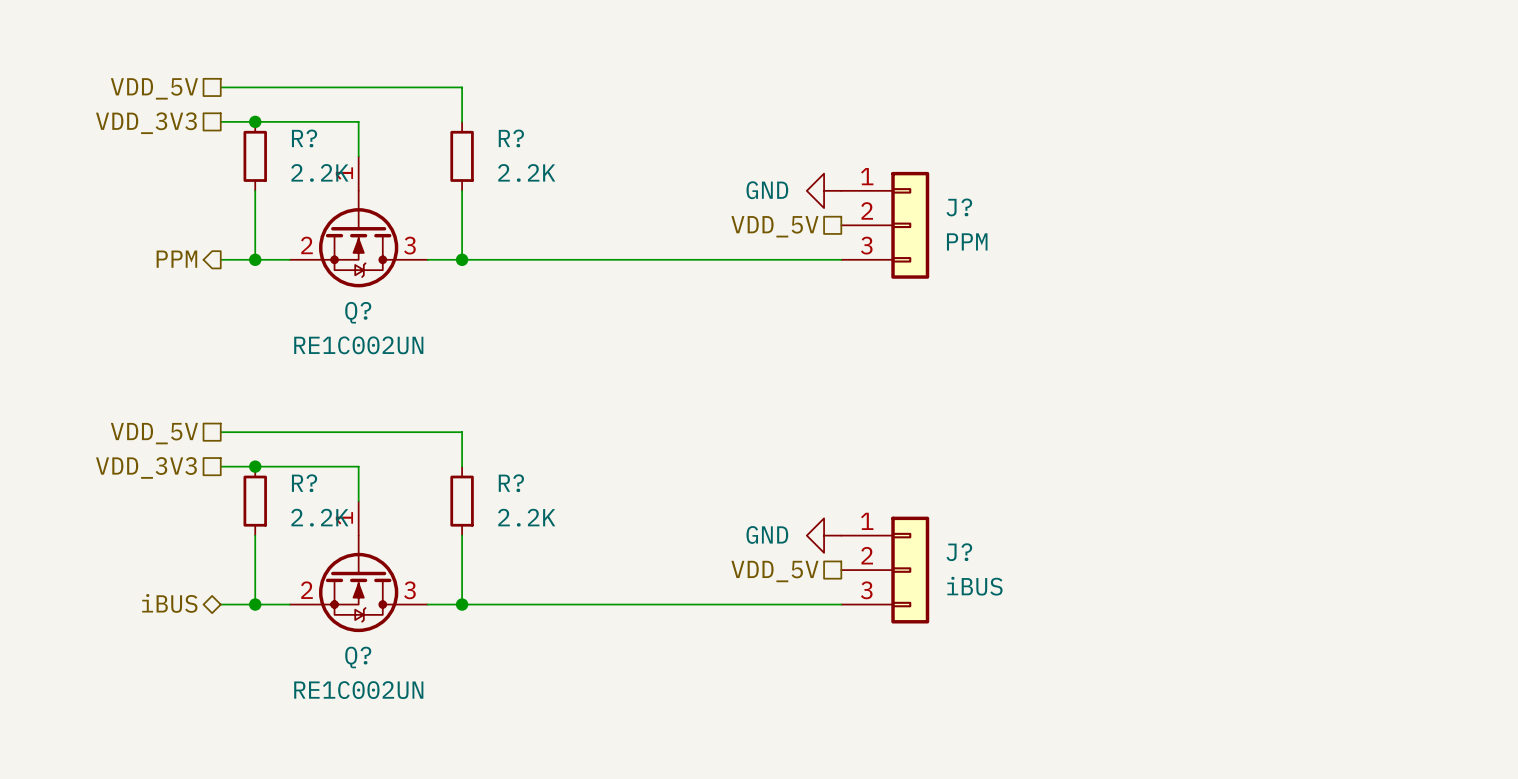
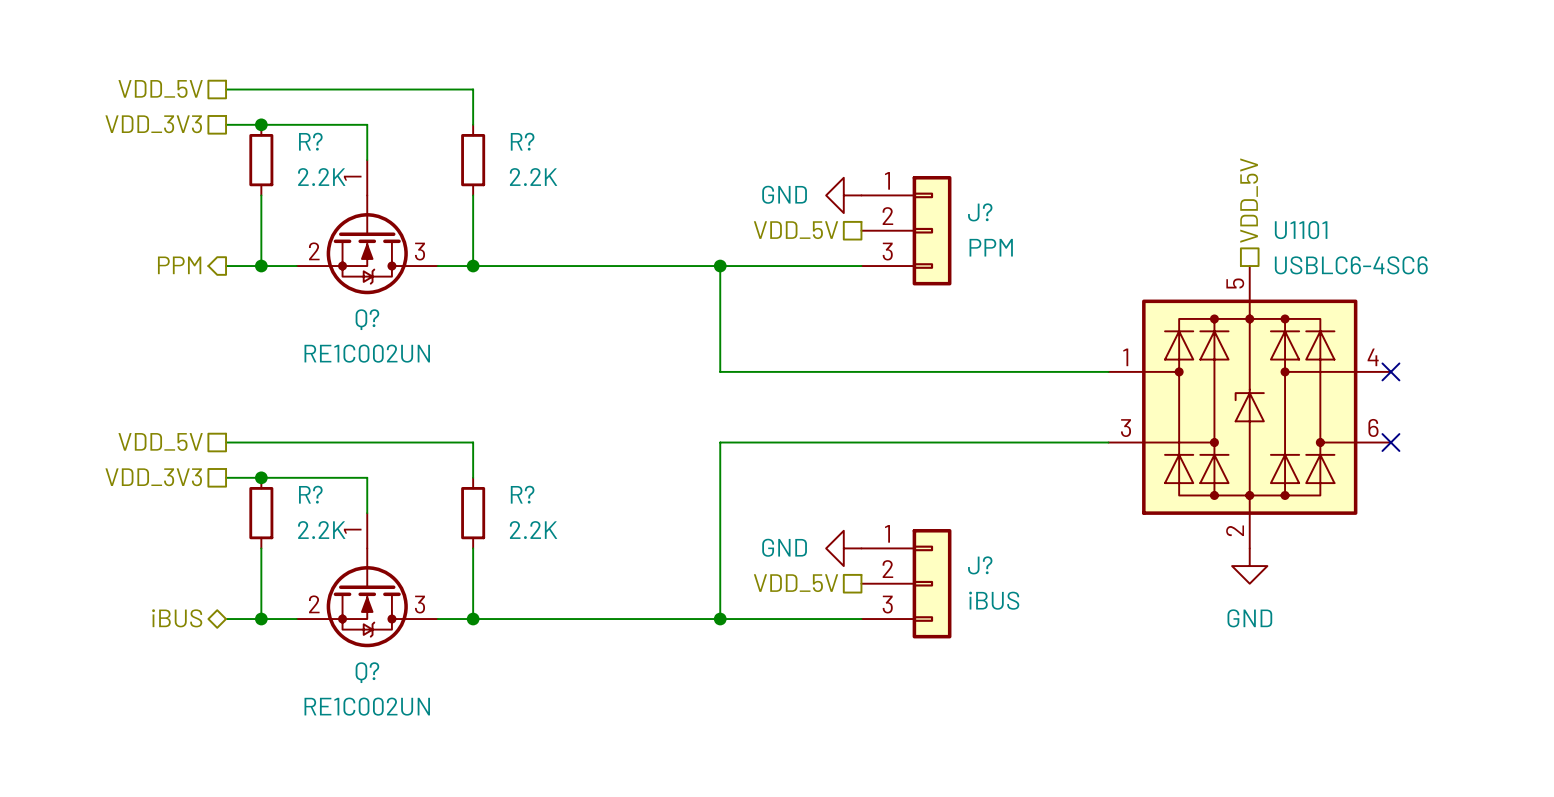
hierarchical label: none -> VDD_5V (1249, 200)
wire: none -> (720, 266) (720, 371) (1108, 371)
junction: none -> (720, 266)
no-connect mark: none -> (1390, 371)
U1101: none -> USBLC6-4SC6 (1249, 407)
wire: none -> (1108, 442) (720, 442) (720, 619)
no-connect mark: none -> (1390, 442)
power symbol: none -> GND (1249, 566)
junction: none -> (720, 619)

